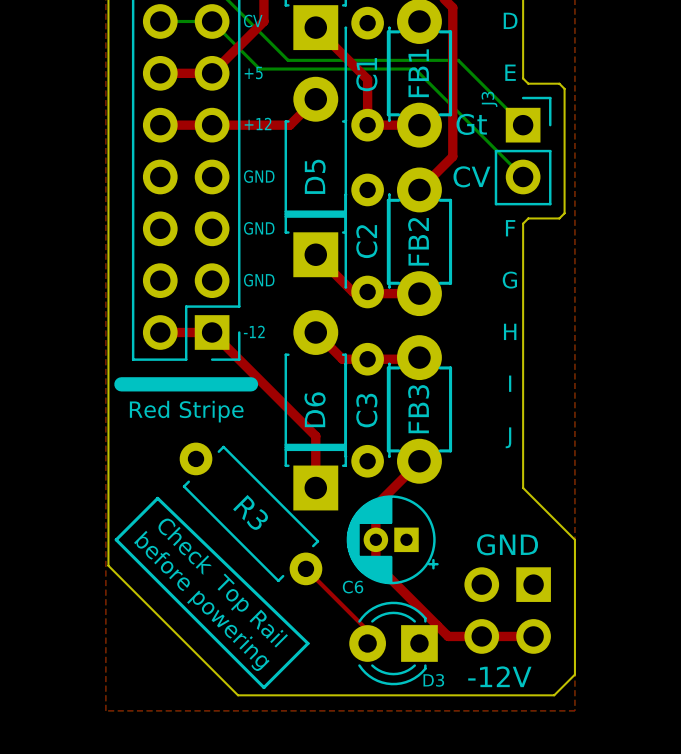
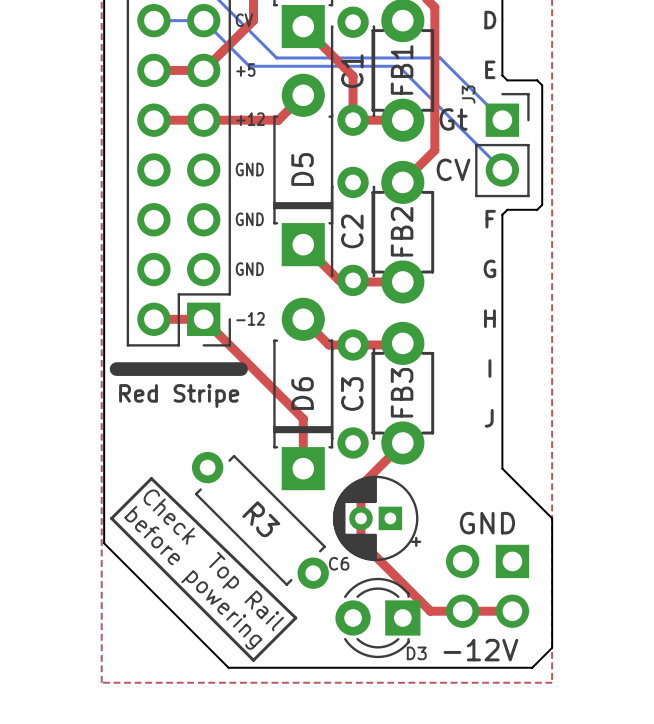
R3 position: (250, 513) -> (260, 520)
top track: (305, 568) (367, 630) -> none

